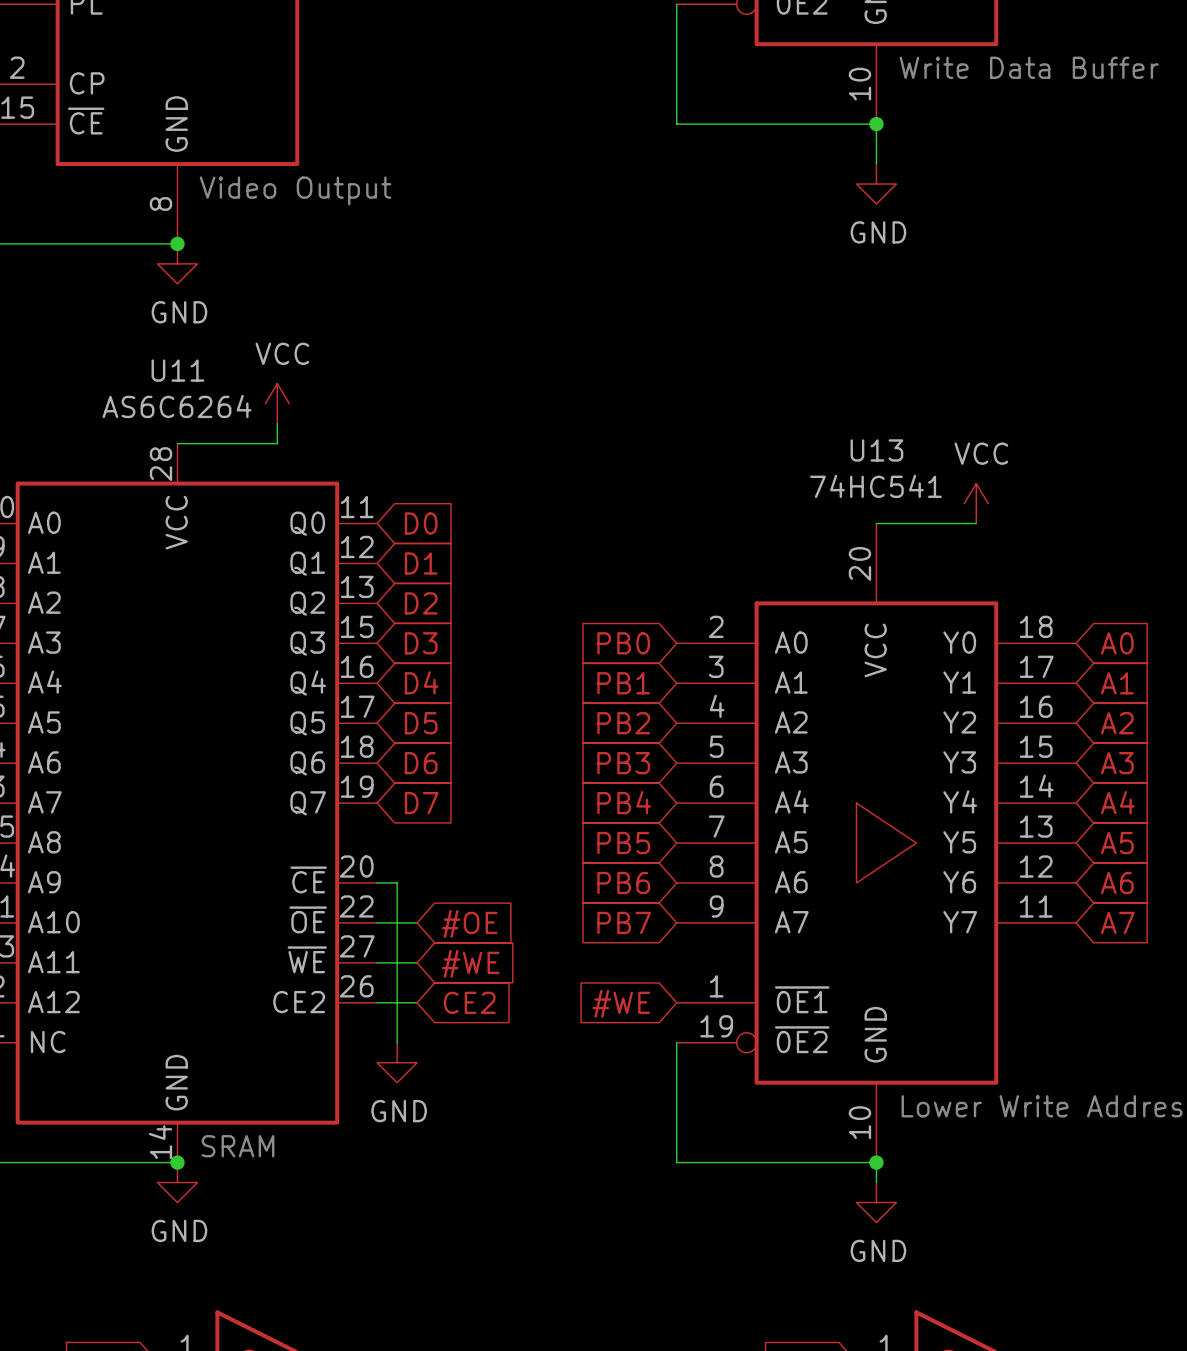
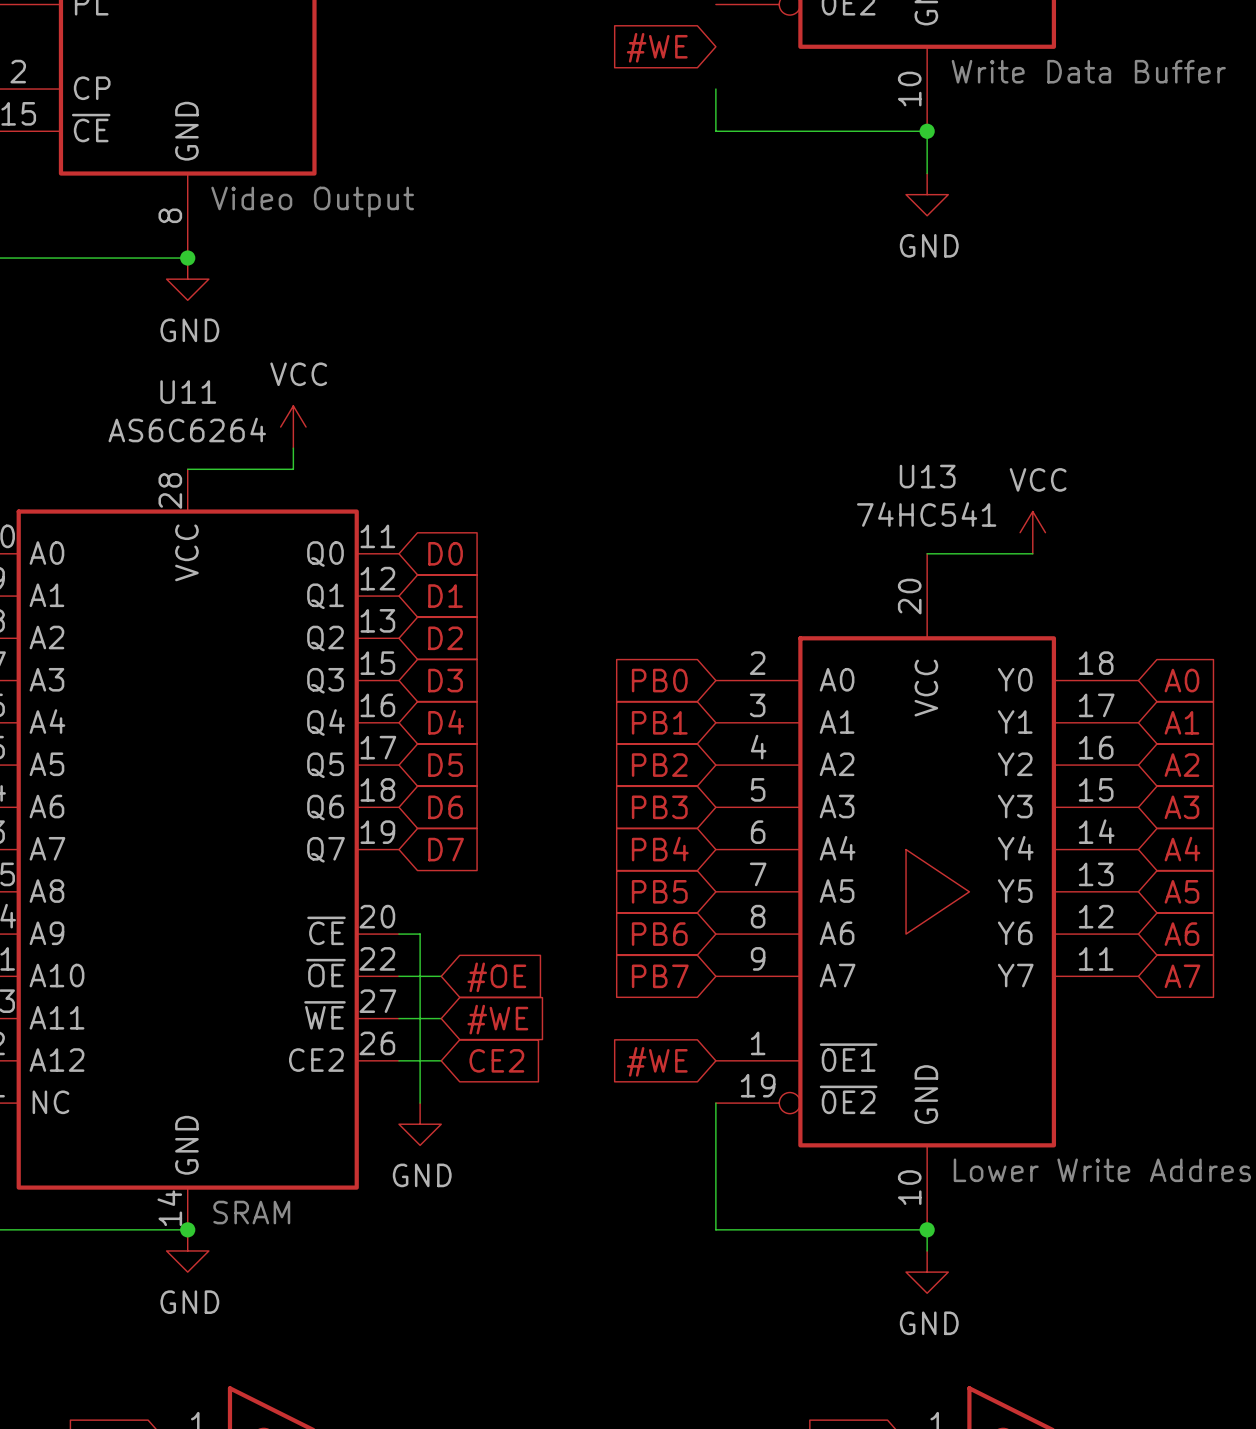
wire: (676, 4) (676, 84) -> none
global label: none -> #WE (657, 47)

